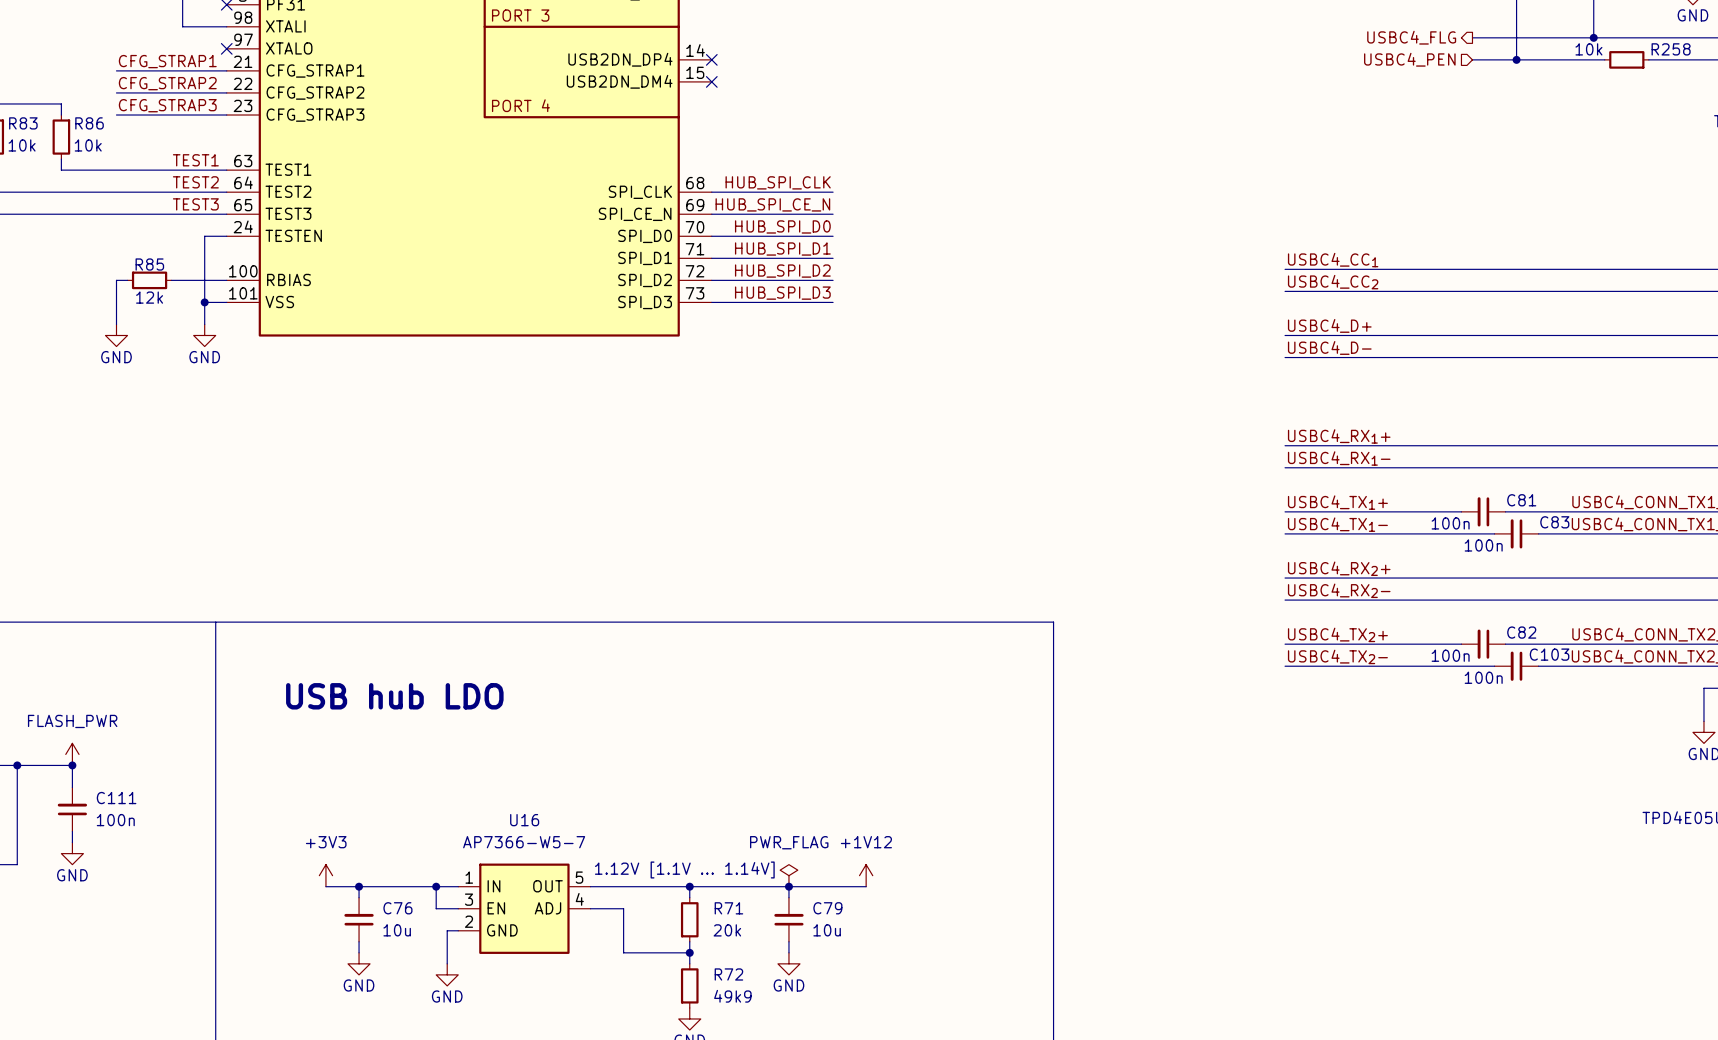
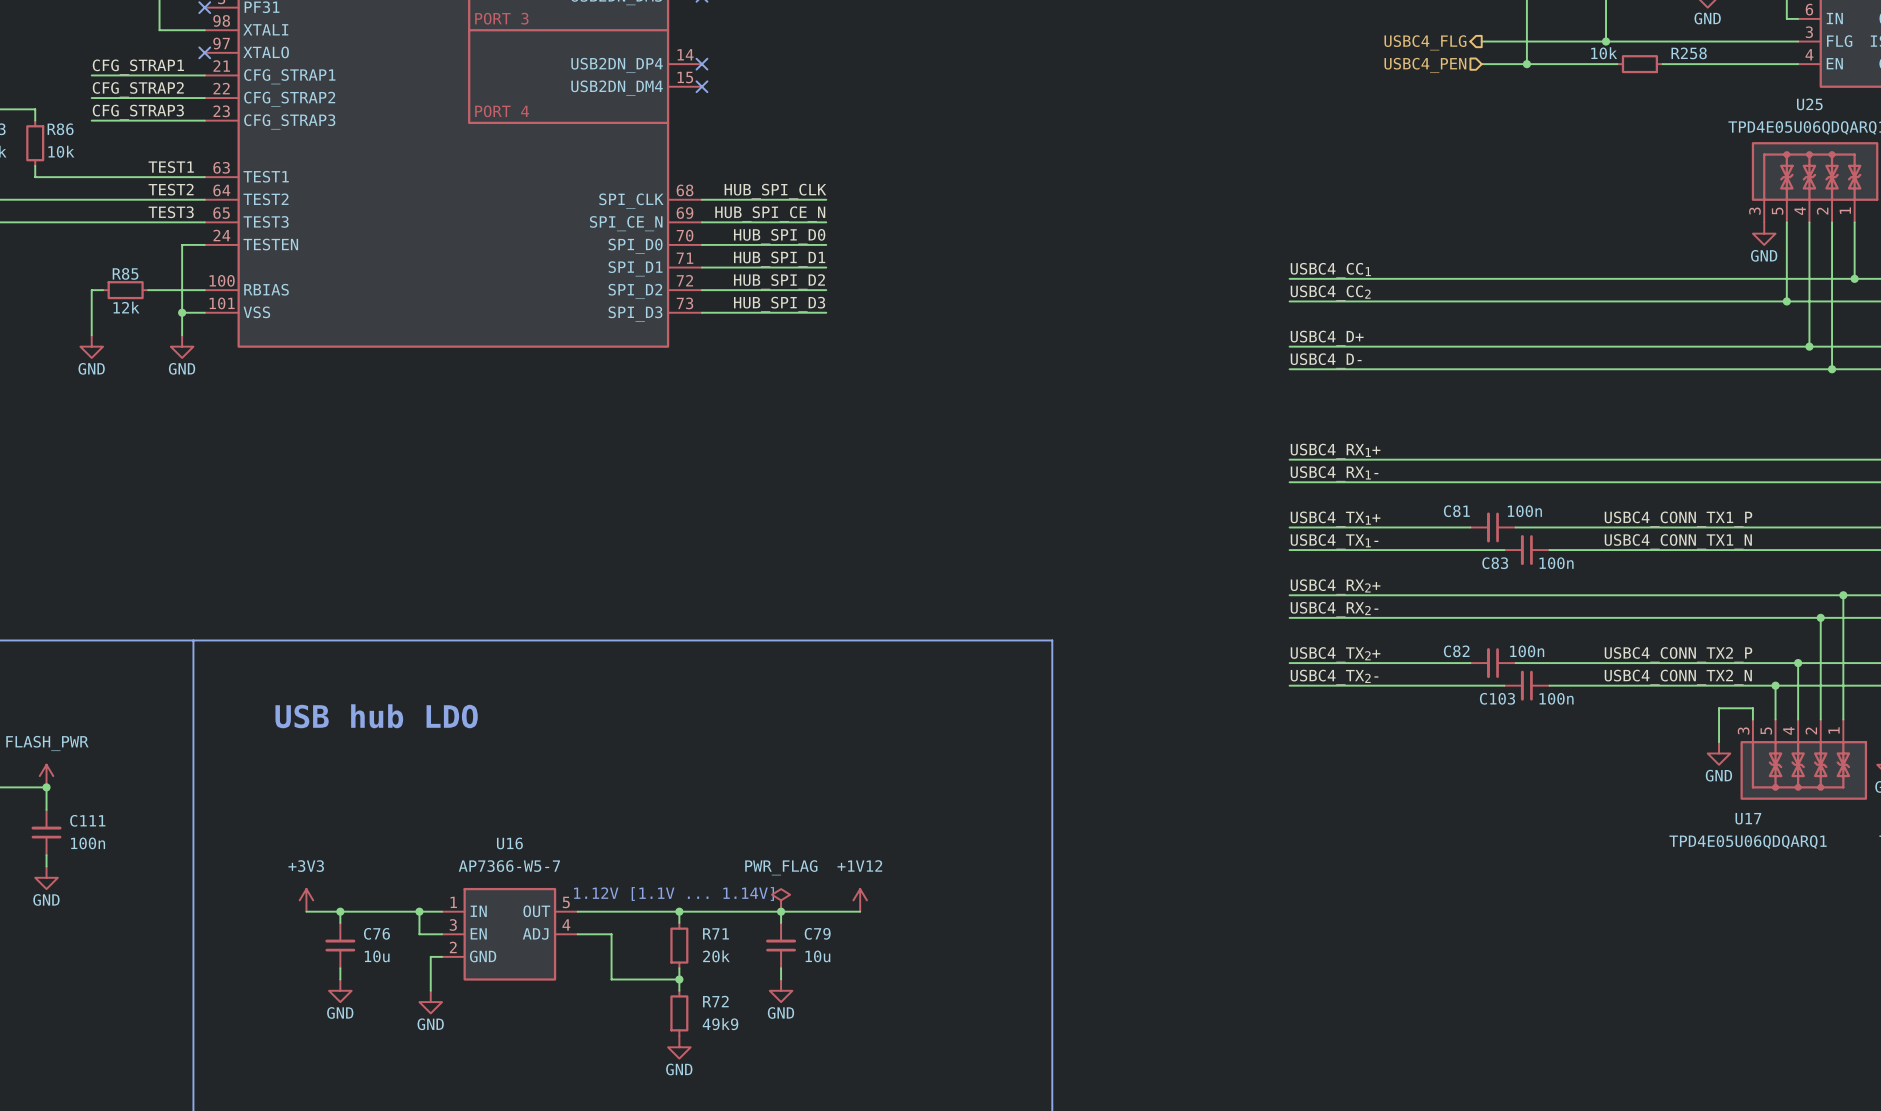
C81 name position: C81 (1521, 500) -> C81 (1456, 511)
C83 name position: C83 (1554, 522) -> C83 (1495, 563)
C81 text position: 100n (1450, 523) -> 100n (1524, 511)
C83 text position: 100n (1483, 545) -> 100n (1556, 563)
C82 name position: C82 (1521, 632) -> C82 (1456, 651)
C103 name position: C103 (1549, 654) -> C103 (1497, 698)
C82 text position: 100n (1450, 655) -> 100n (1527, 651)
C103 text position: 100n (1483, 677) -> 100n (1556, 698)

